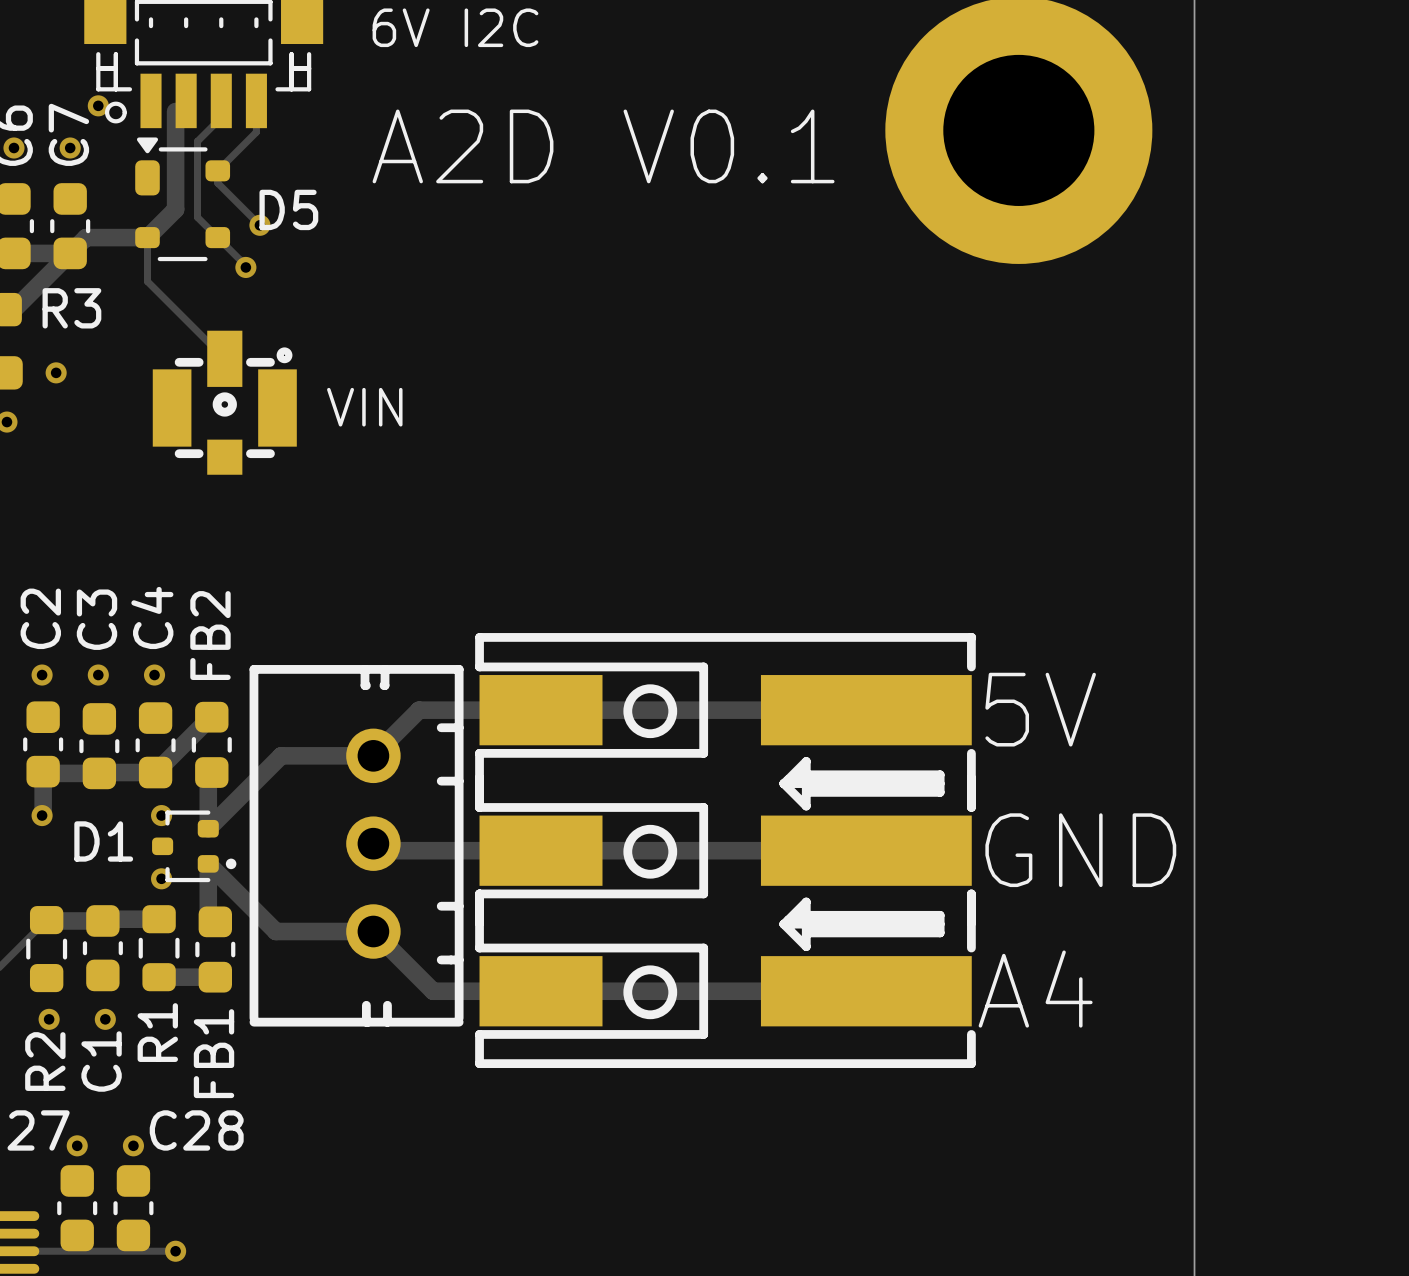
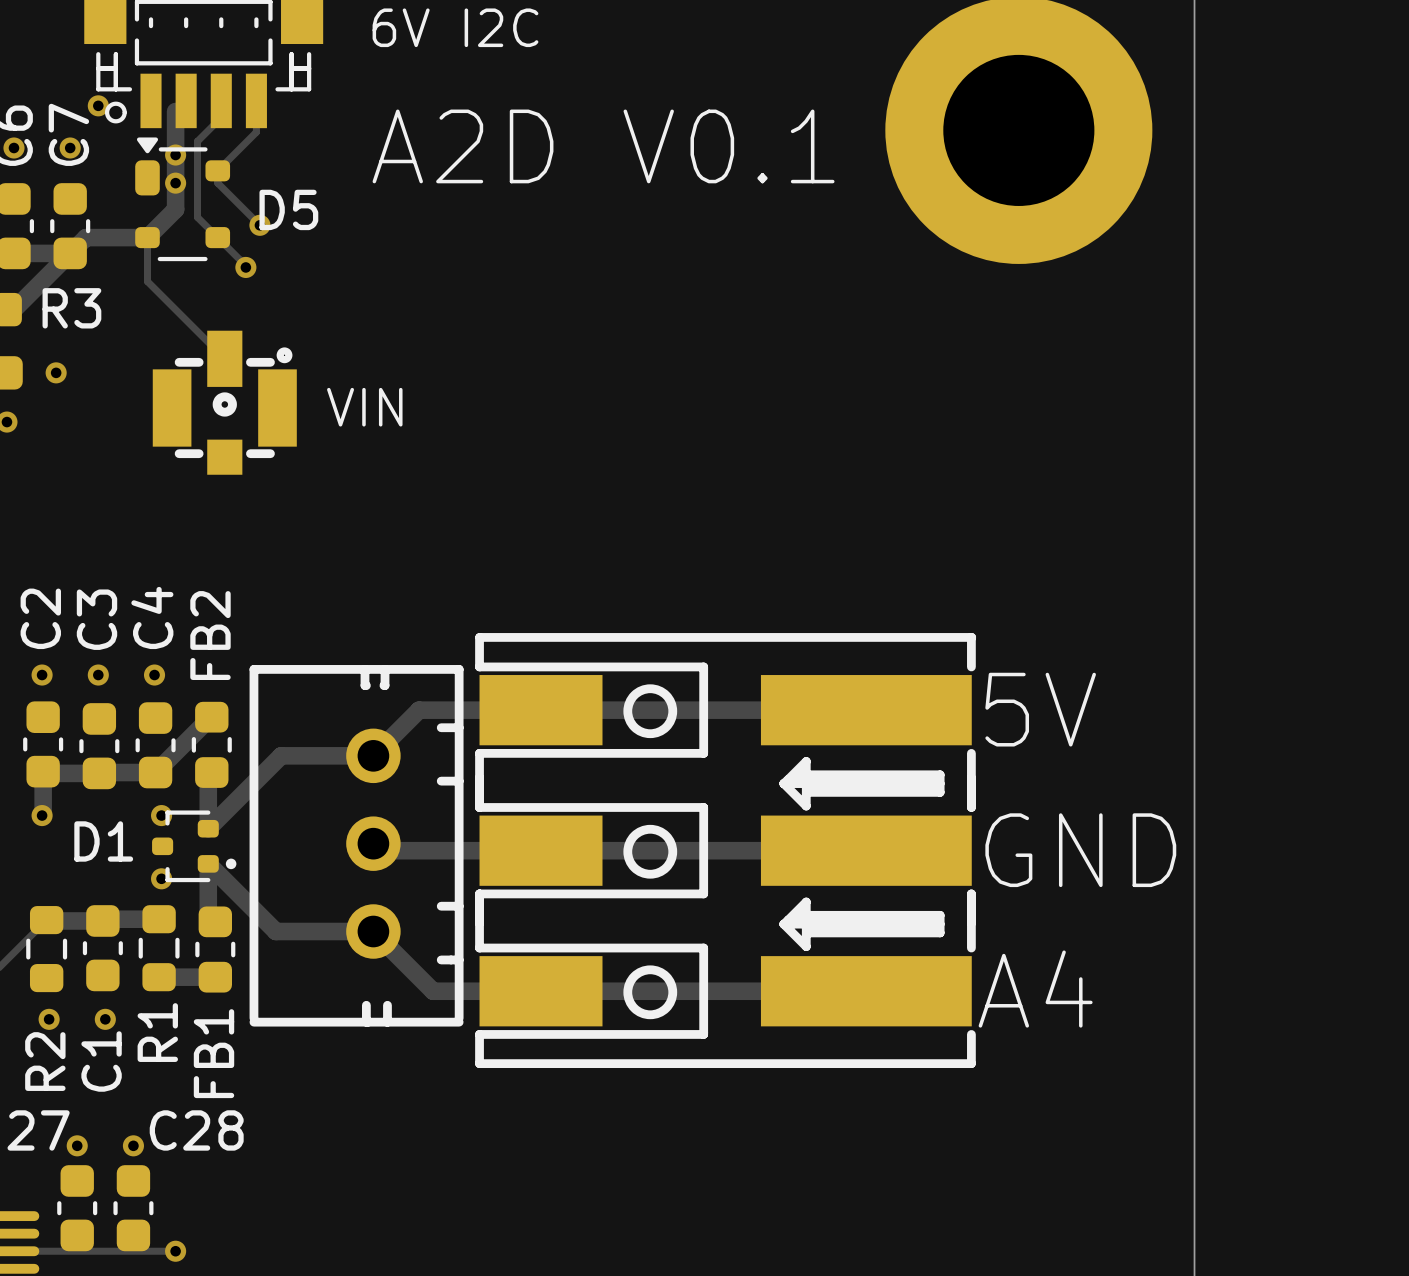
via: none -> (175, 155)
via: none -> (175, 183)

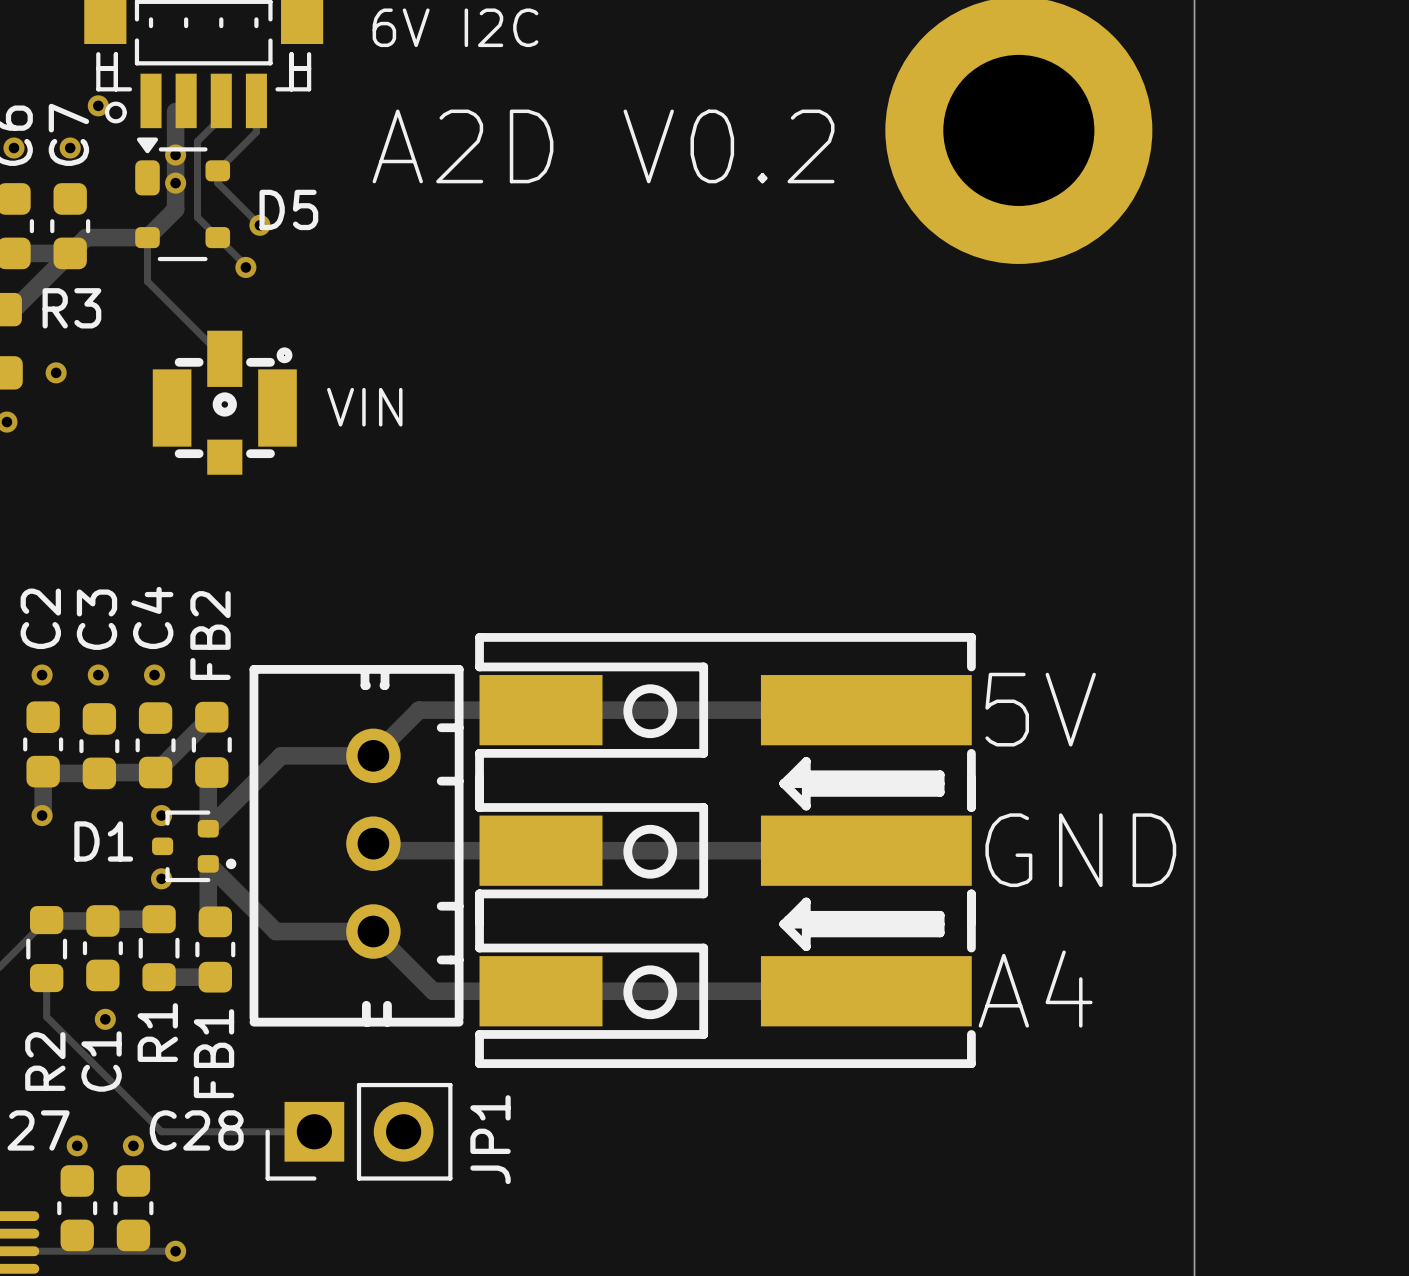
text: A2D V0.1 (603, 146) -> A2D V0.2 (603, 146)
track: none -> (46, 978) (46, 1016) (161, 1131) (314, 1131)
via: (49, 1019) -> none
JP1: none -> (359, 1131)

